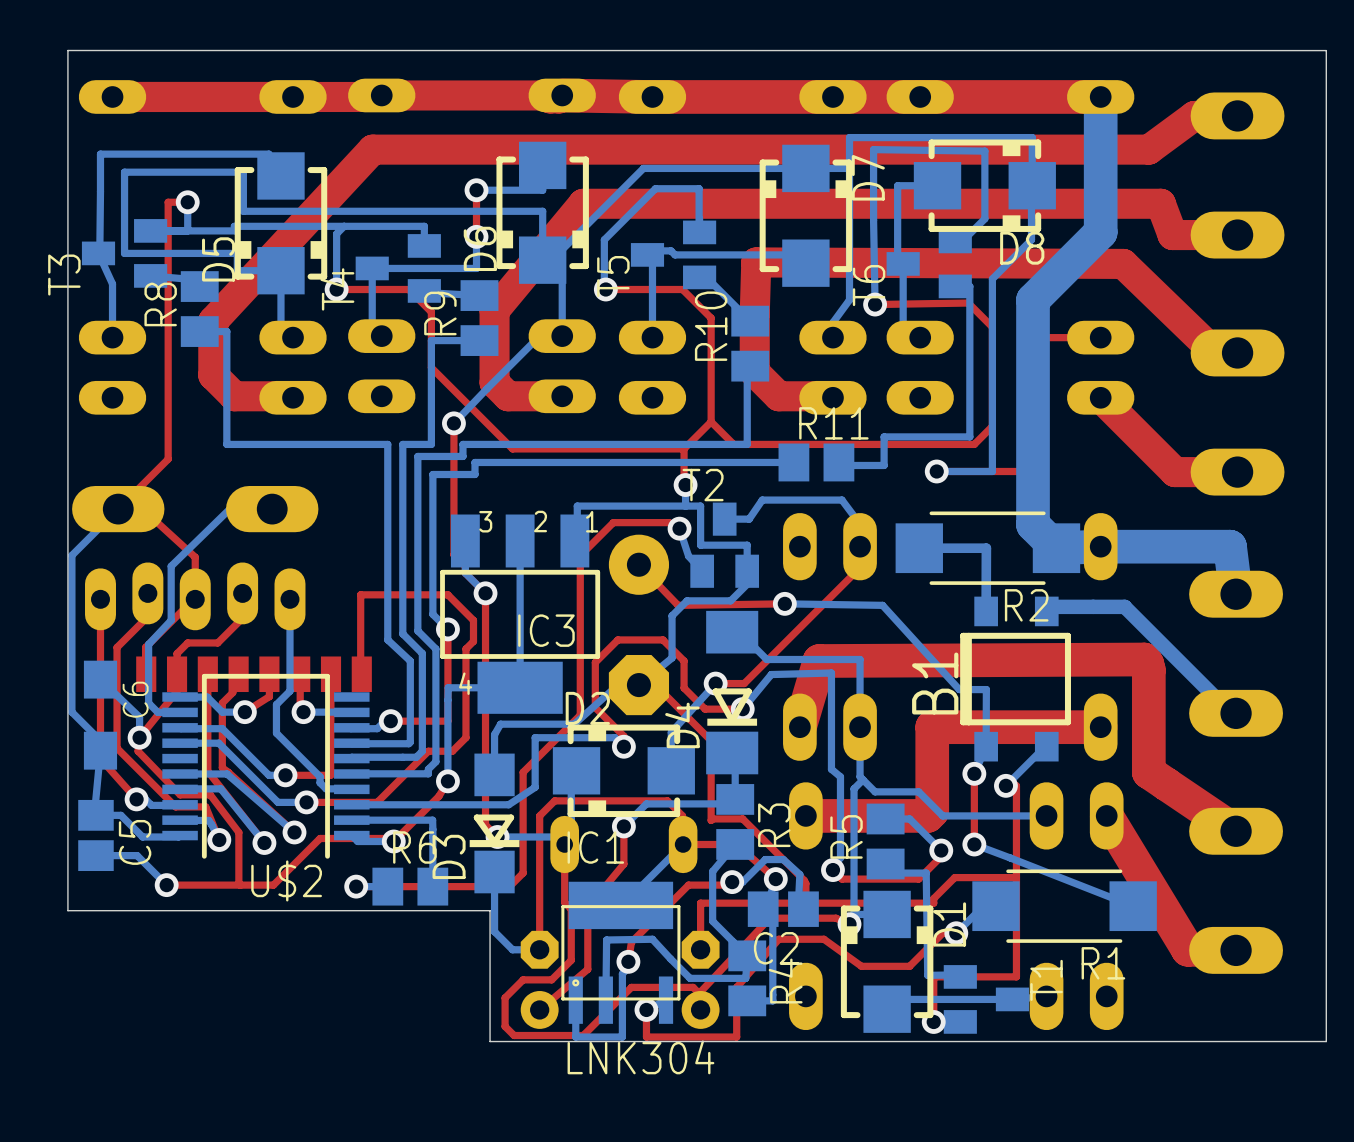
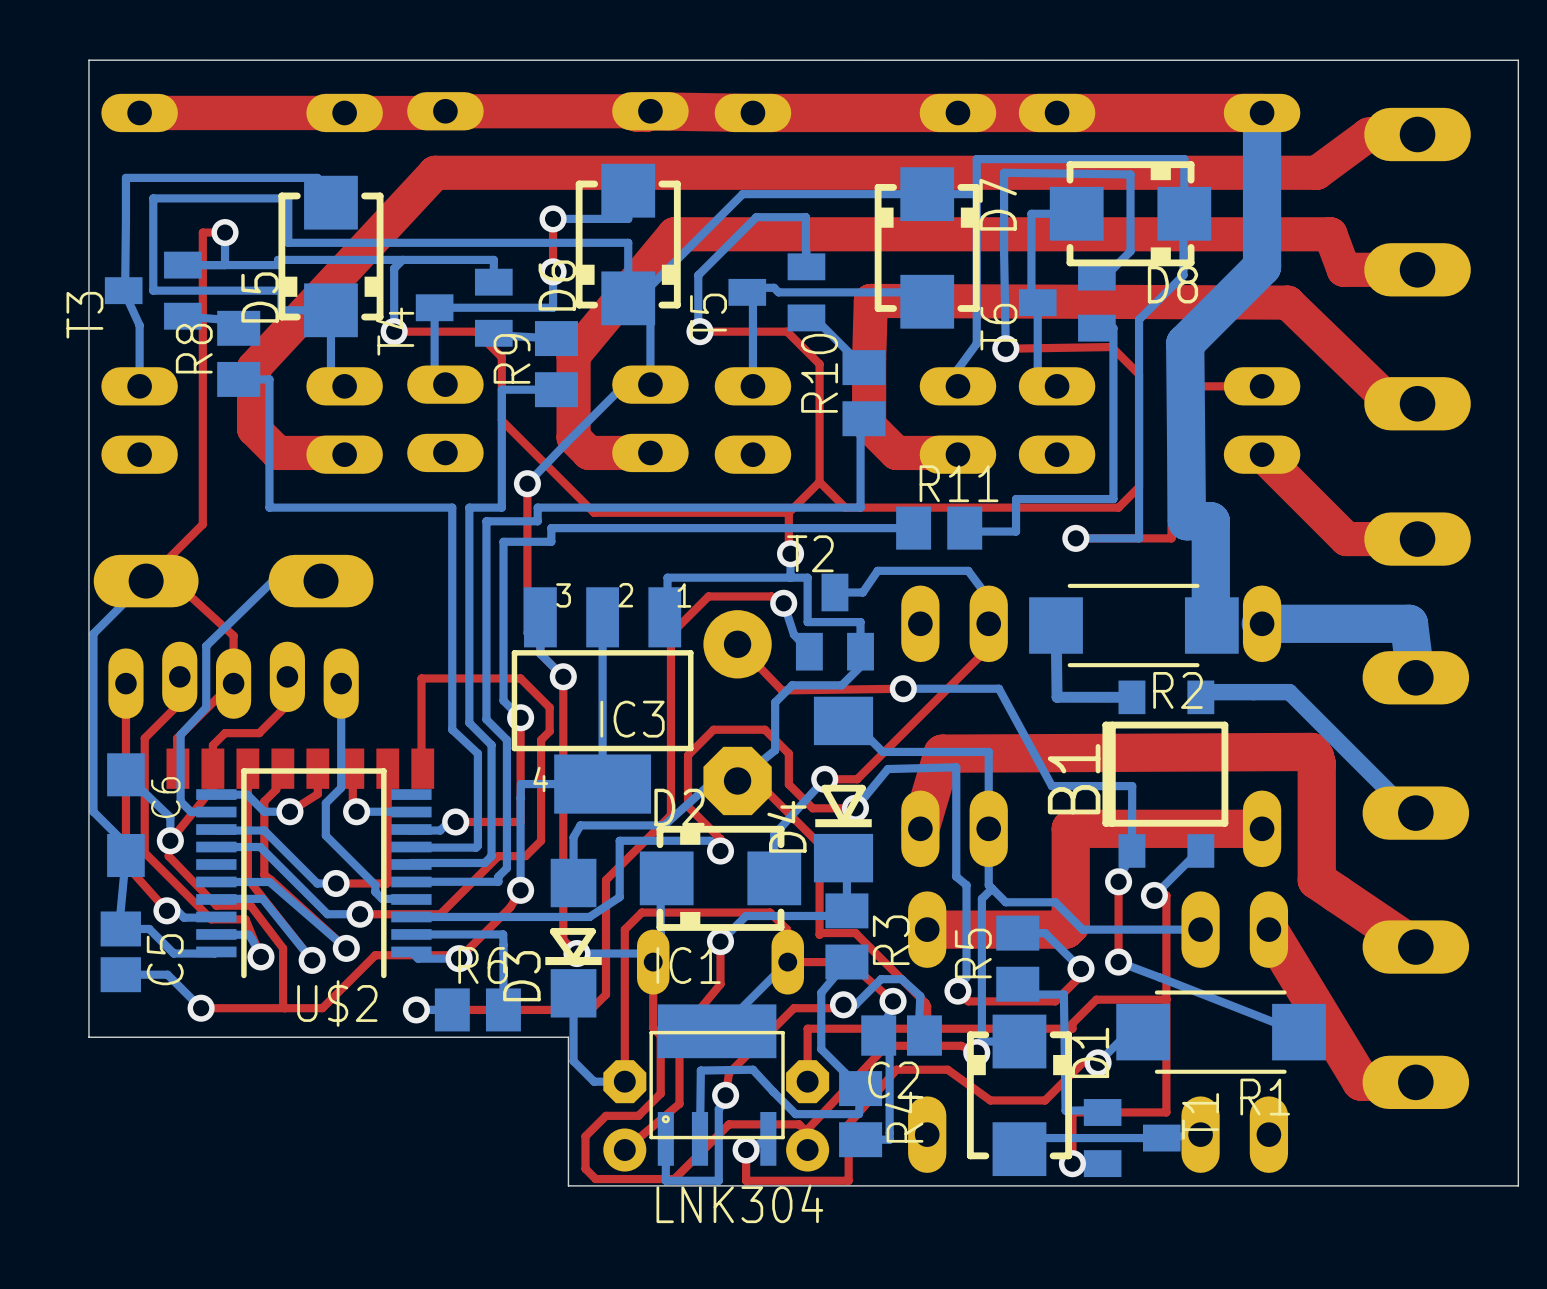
bottom track: (1033, 300) (1033, 524) (1056, 548) (1097, 546) -> (1185, 343) (1186, 521) (1210, 521) (1210, 627)
bottom track: (919, 548) (986, 548) (986, 611) -> (1056, 616) (1057, 697) (1131, 697)
bottom track: (784, 603) (882, 605) (959, 689) -> (903, 688) (998, 688) (1051, 786) (1101, 786)

